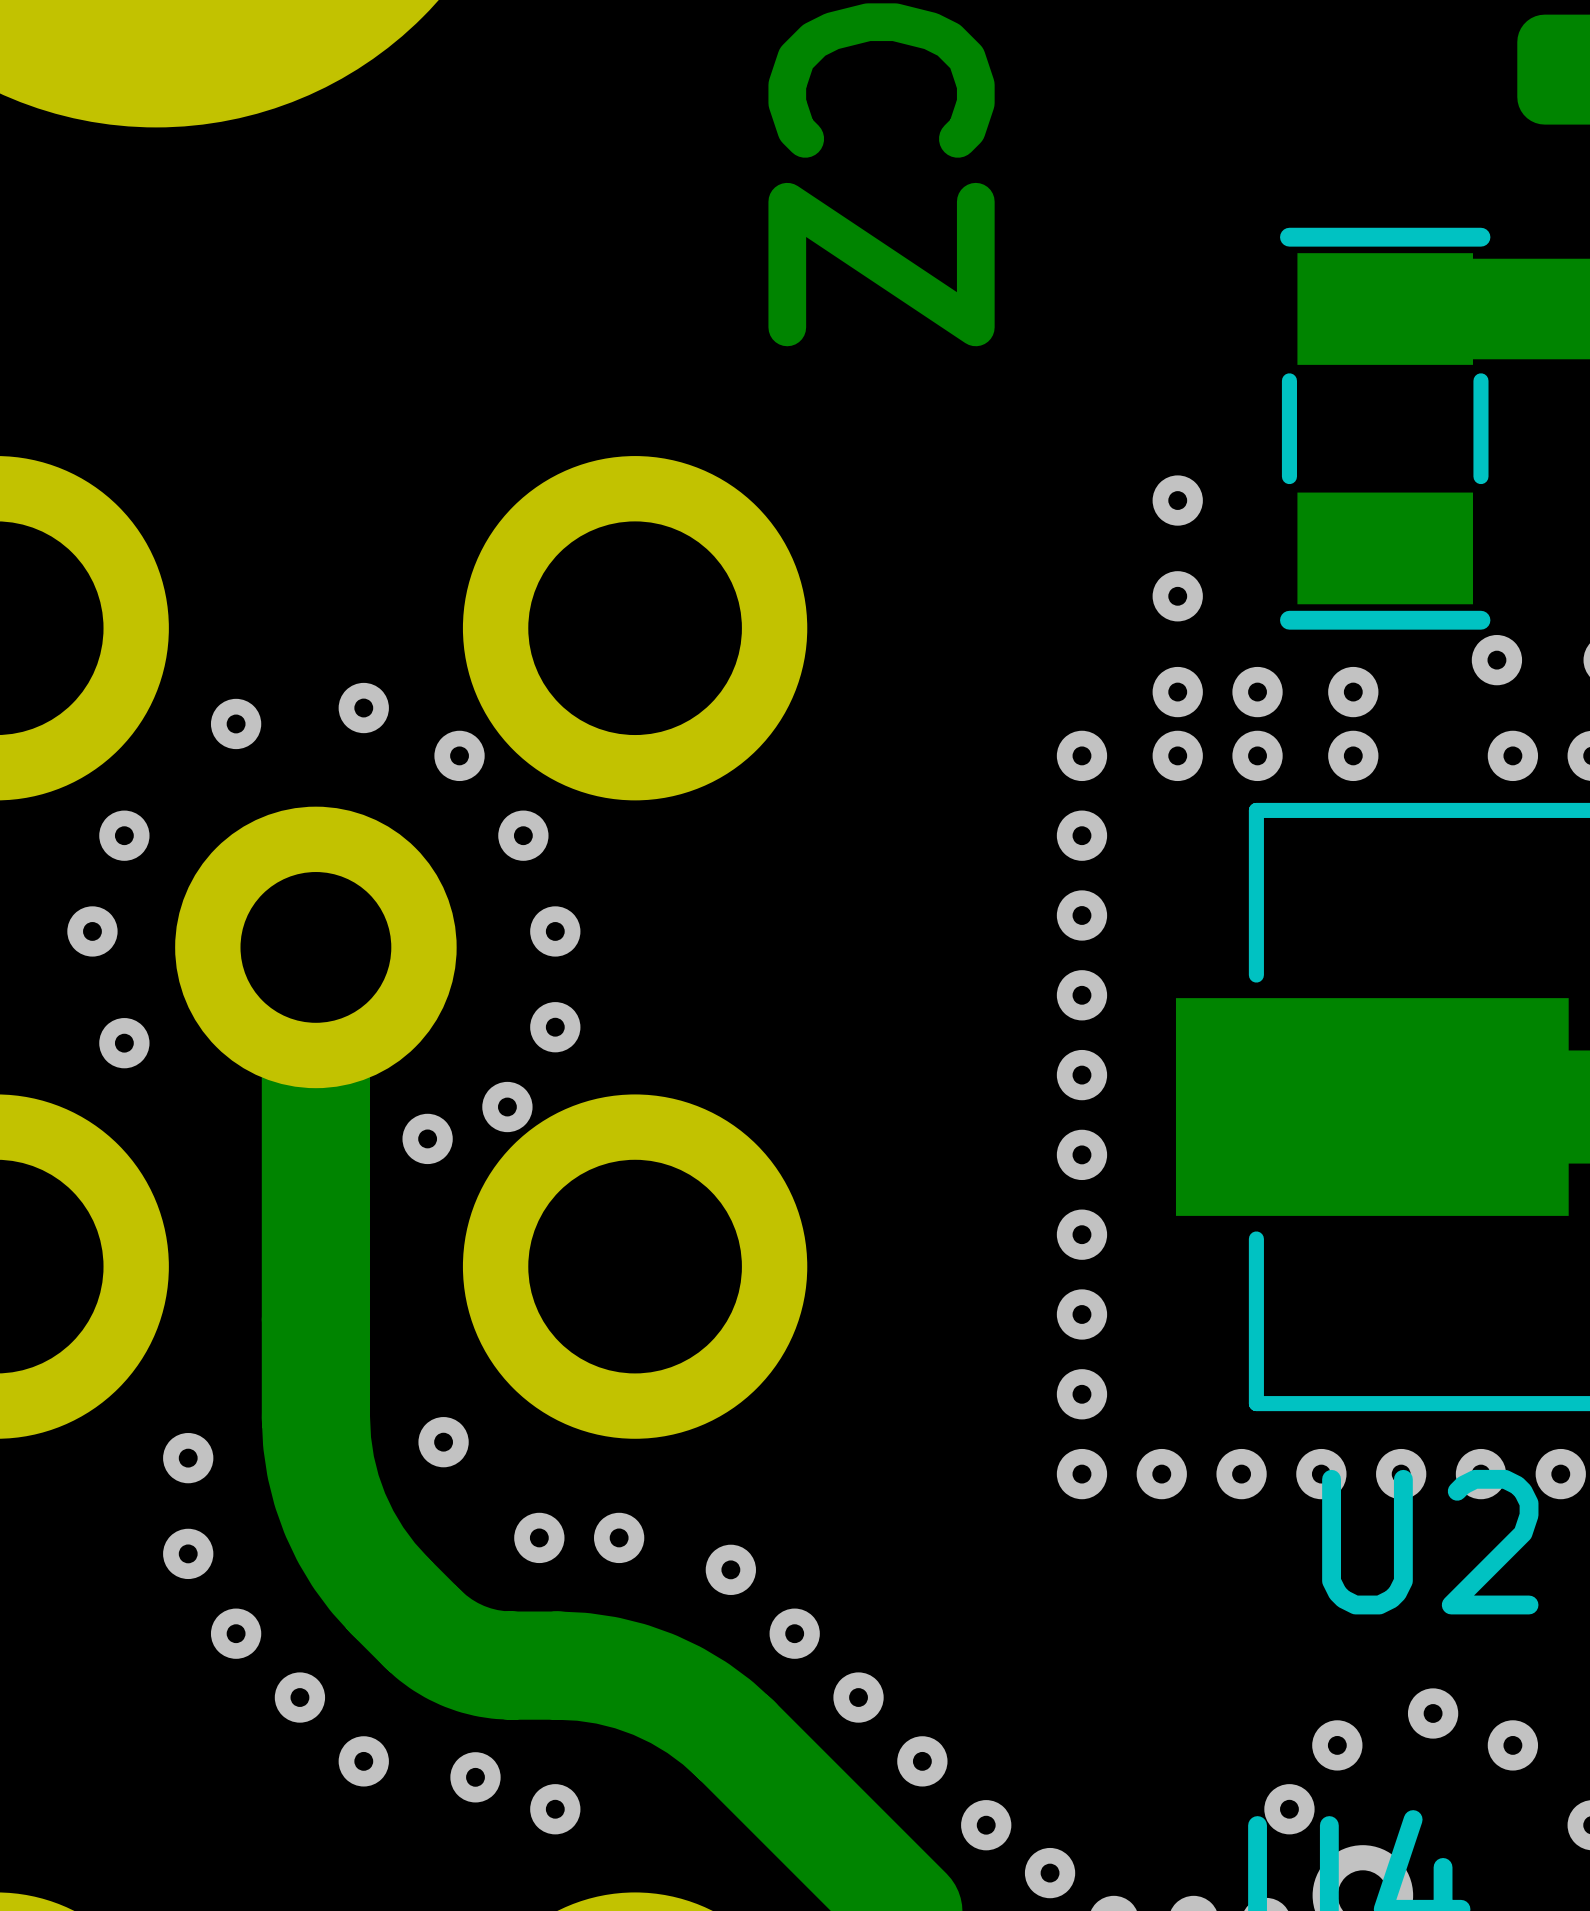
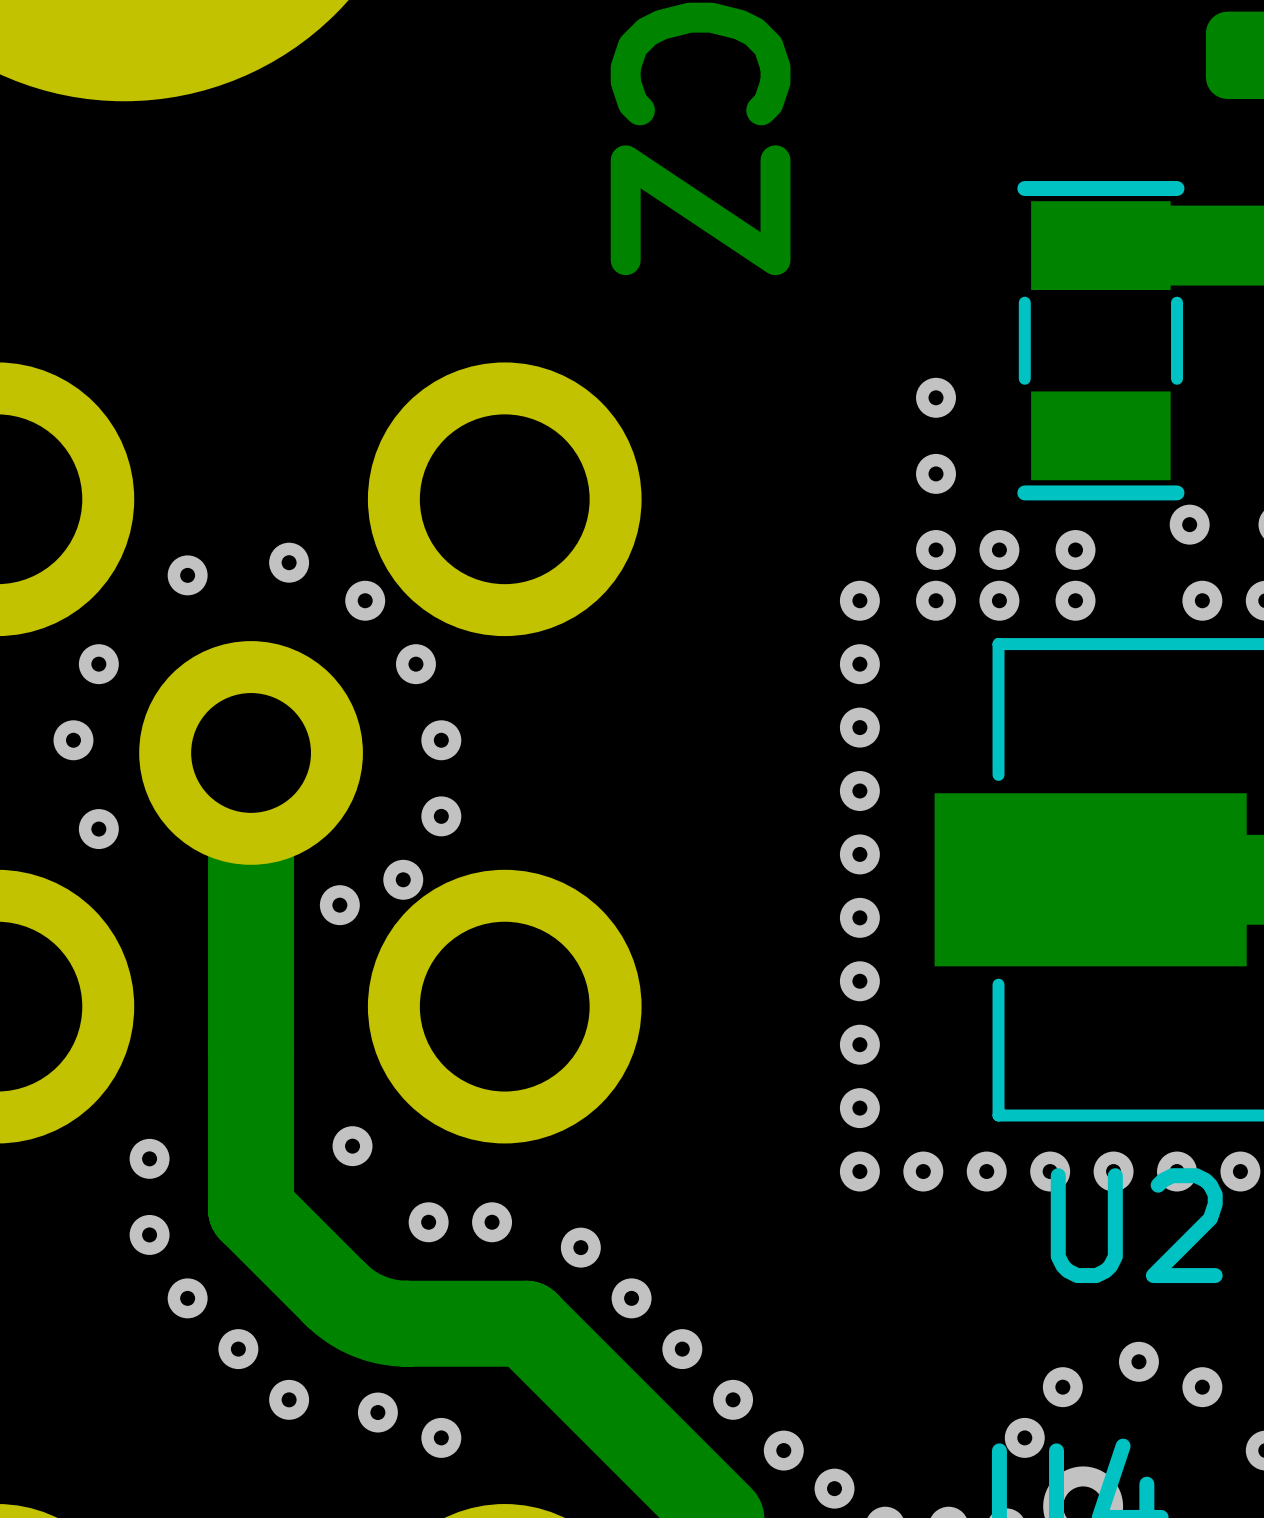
track: (315, 1417) (320, 1466) (335, 1514) (358, 1557) (389, 1595) -> (251, 1126) (251, 1209) (309, 1268)
track: (557, 1665) (606, 1670) (654, 1684) (697, 1707) (735, 1739) -> (443, 1323) (526, 1323) (584, 1382)

